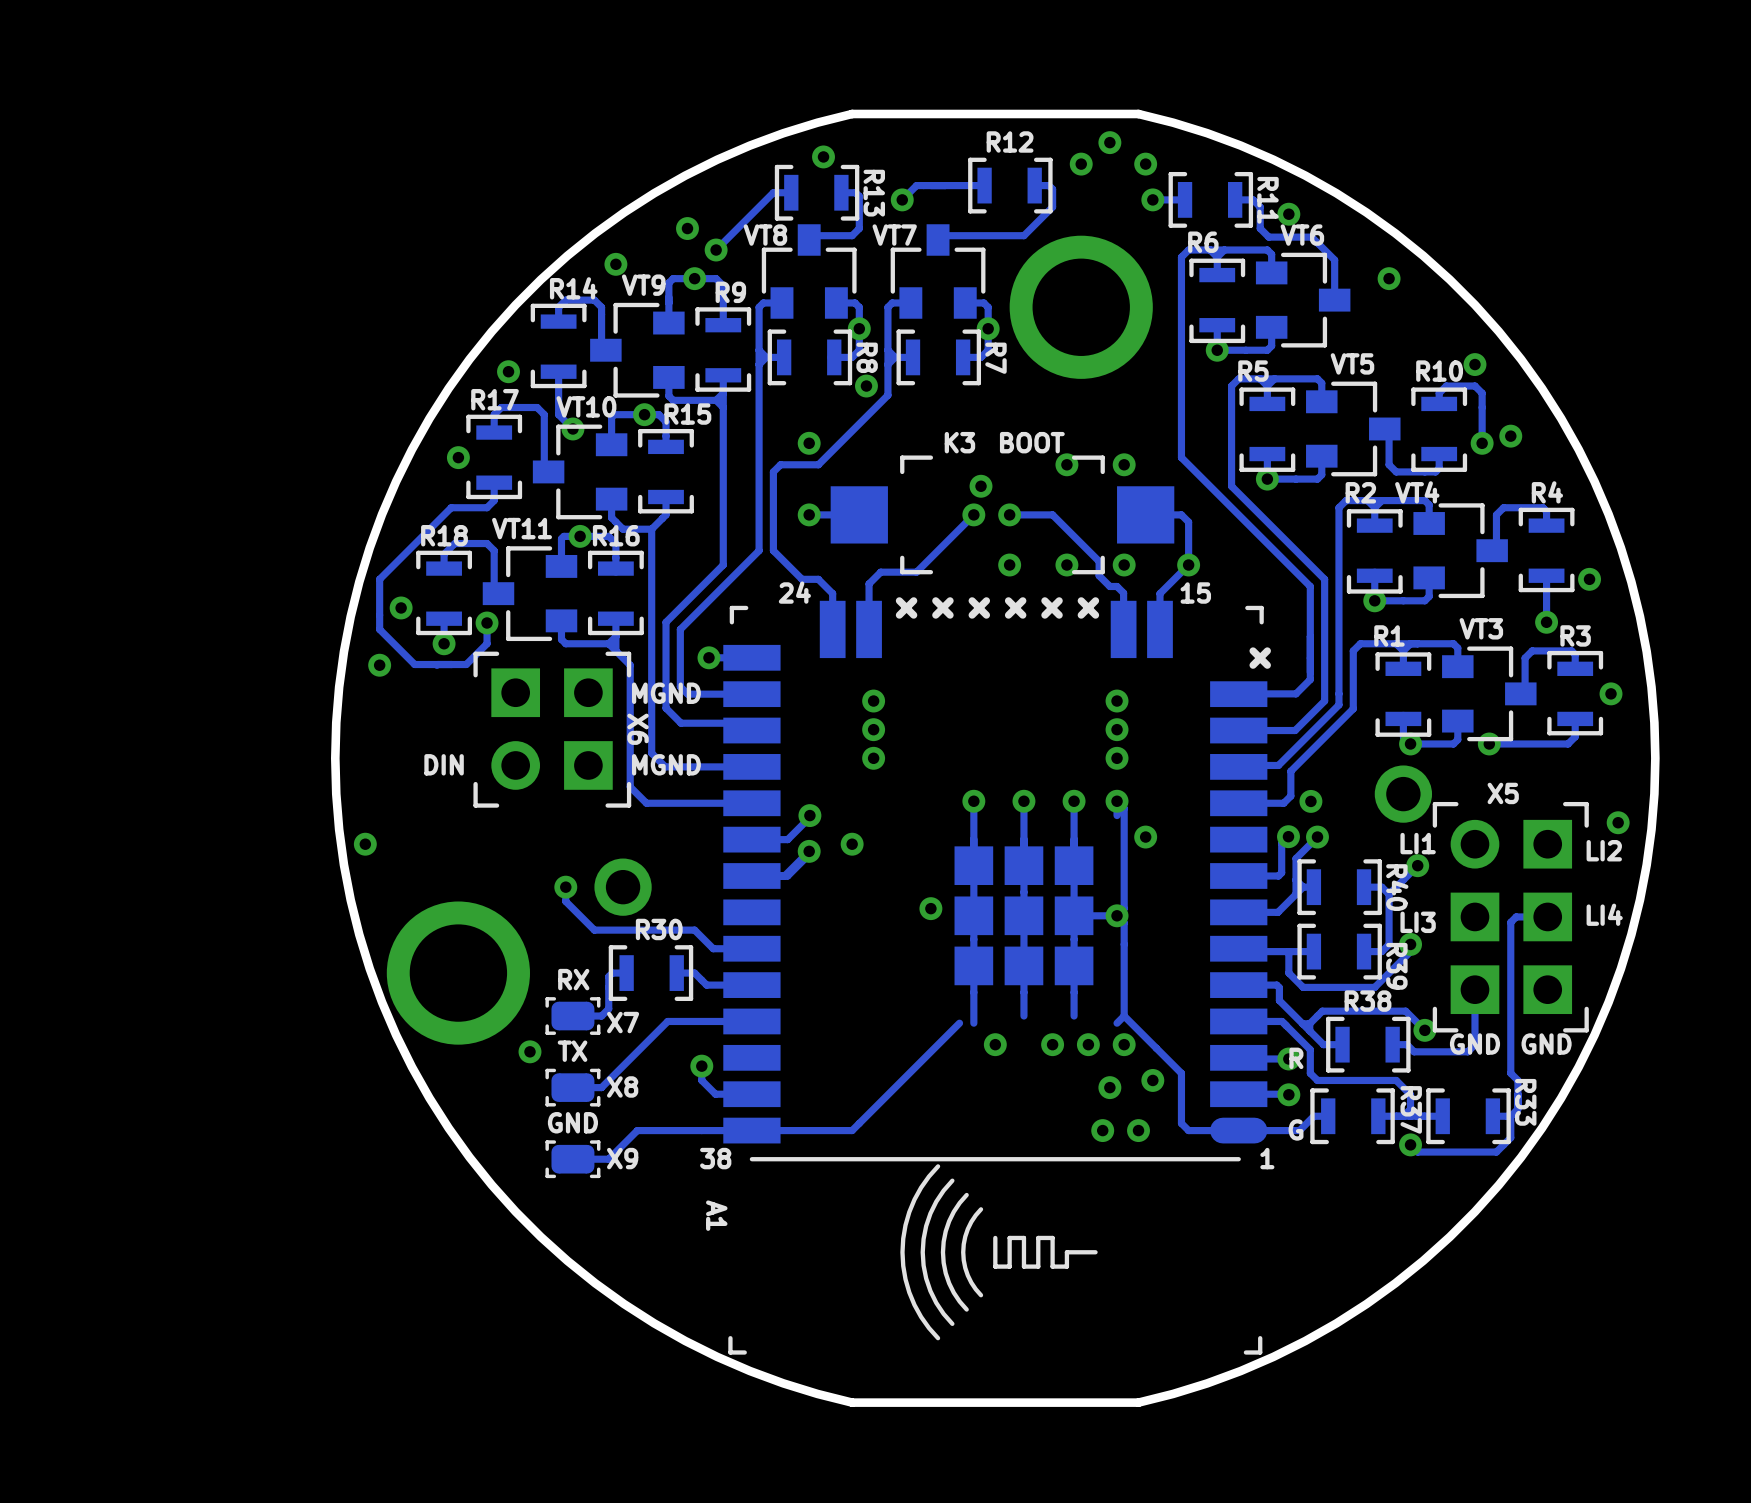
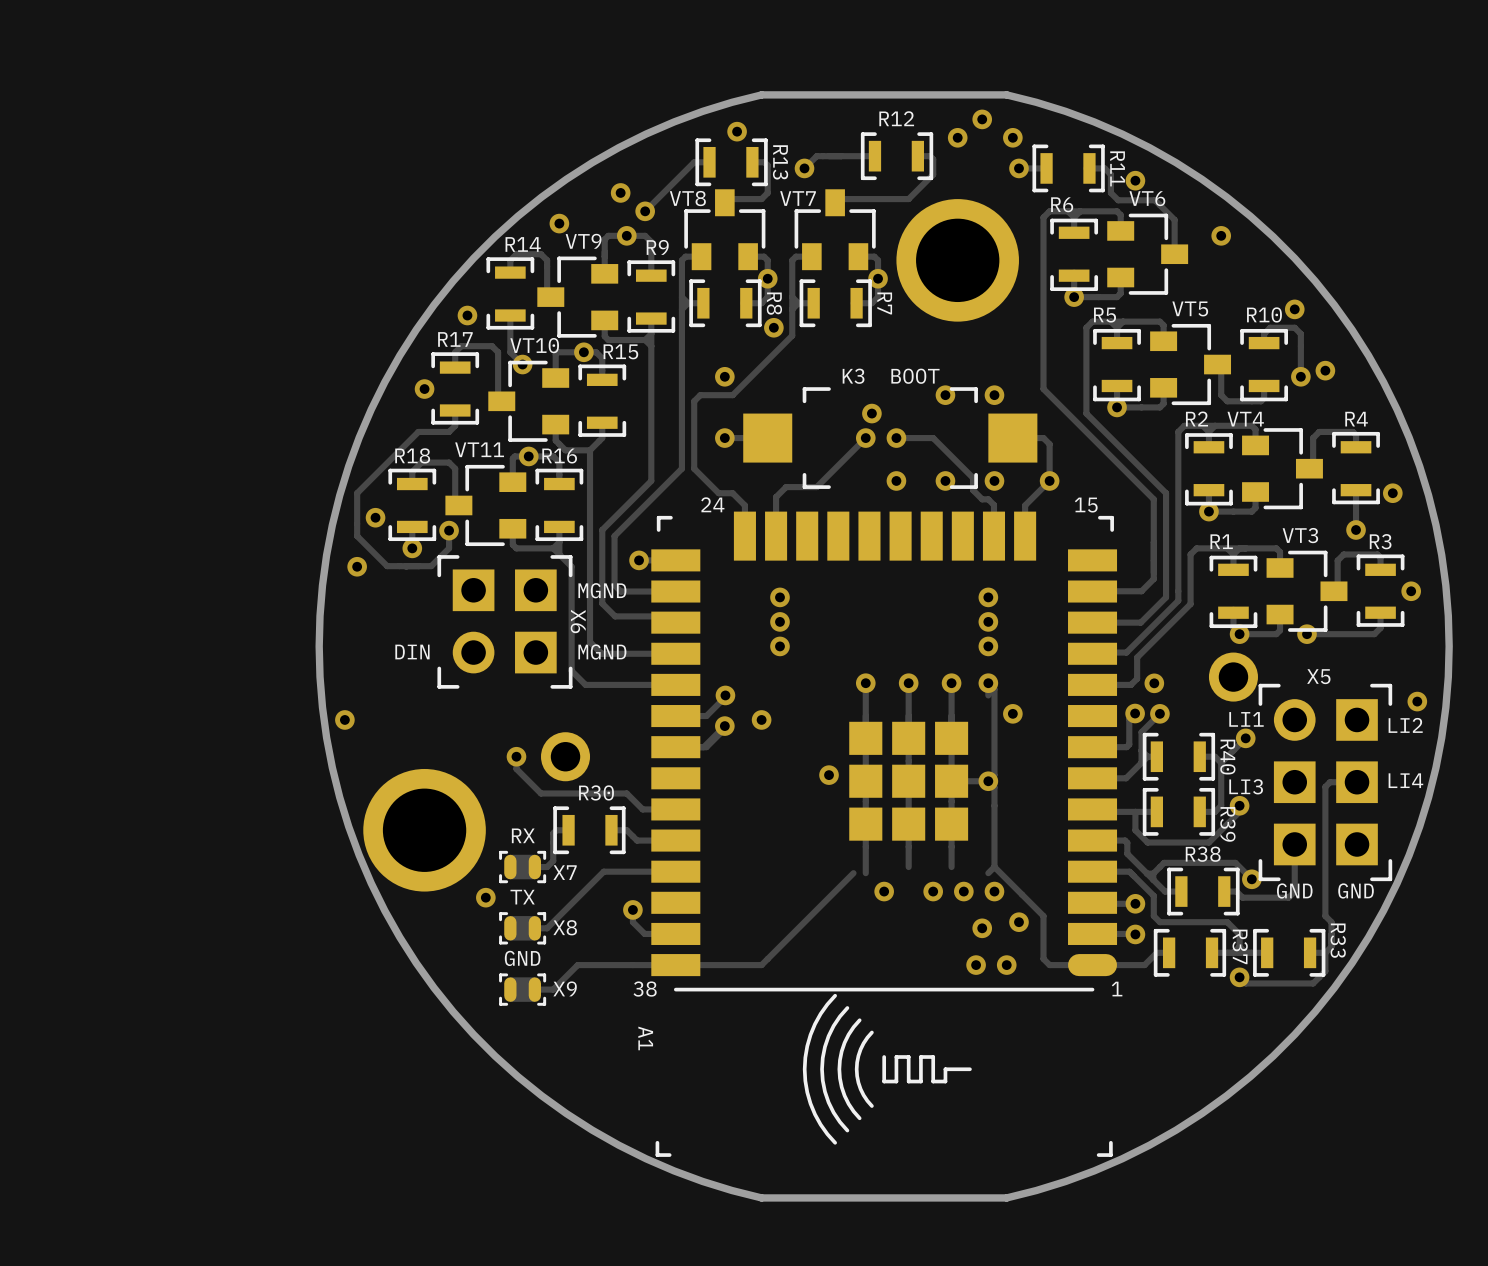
A1 footprint: [723, 597, 1271, 1355] -> [651, 511, 1118, 1157]
text: R (1296, 1058) -> none
text: G (1296, 1129) -> none

